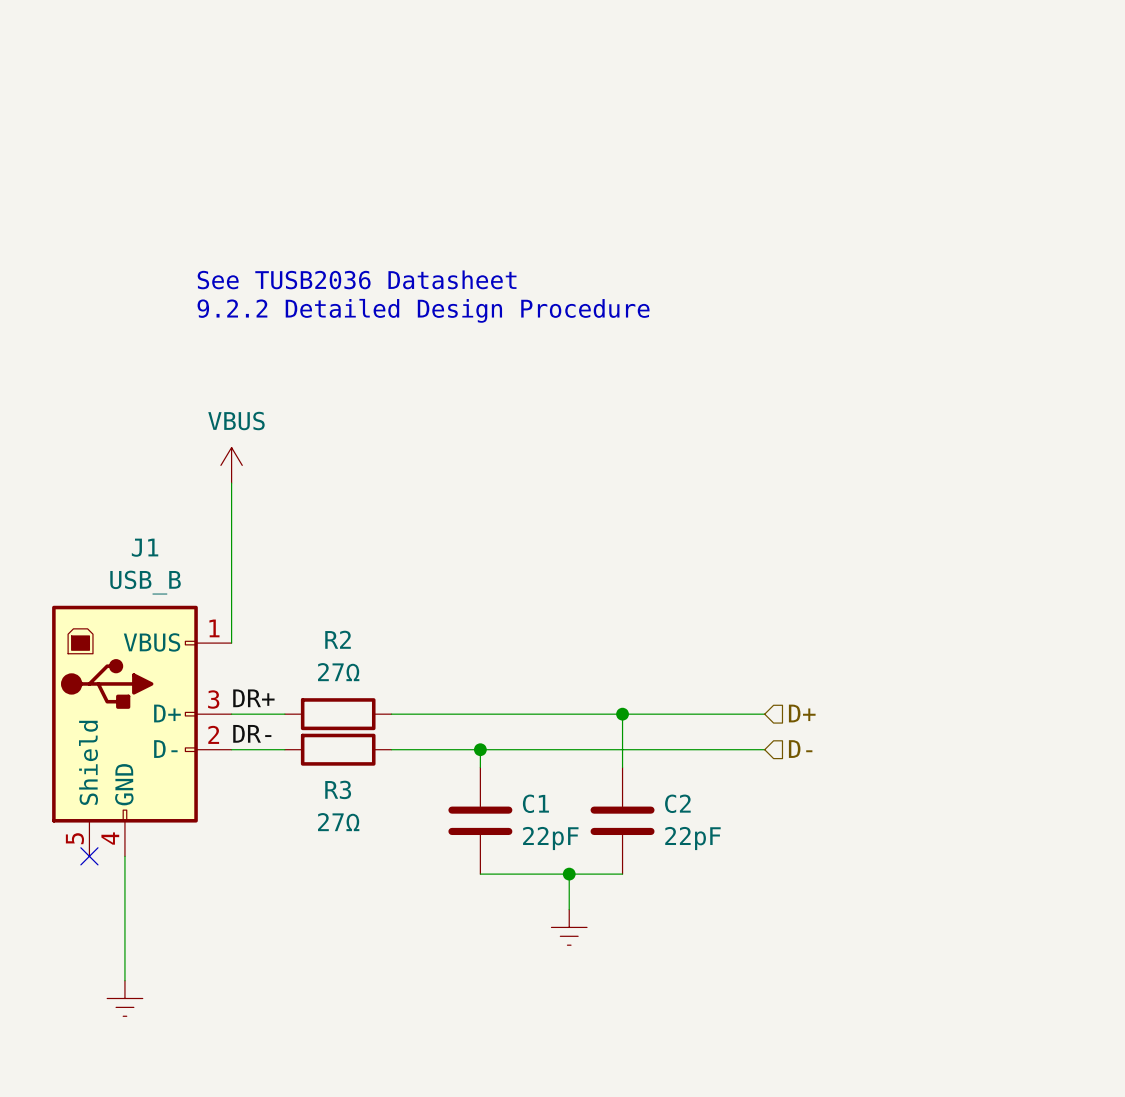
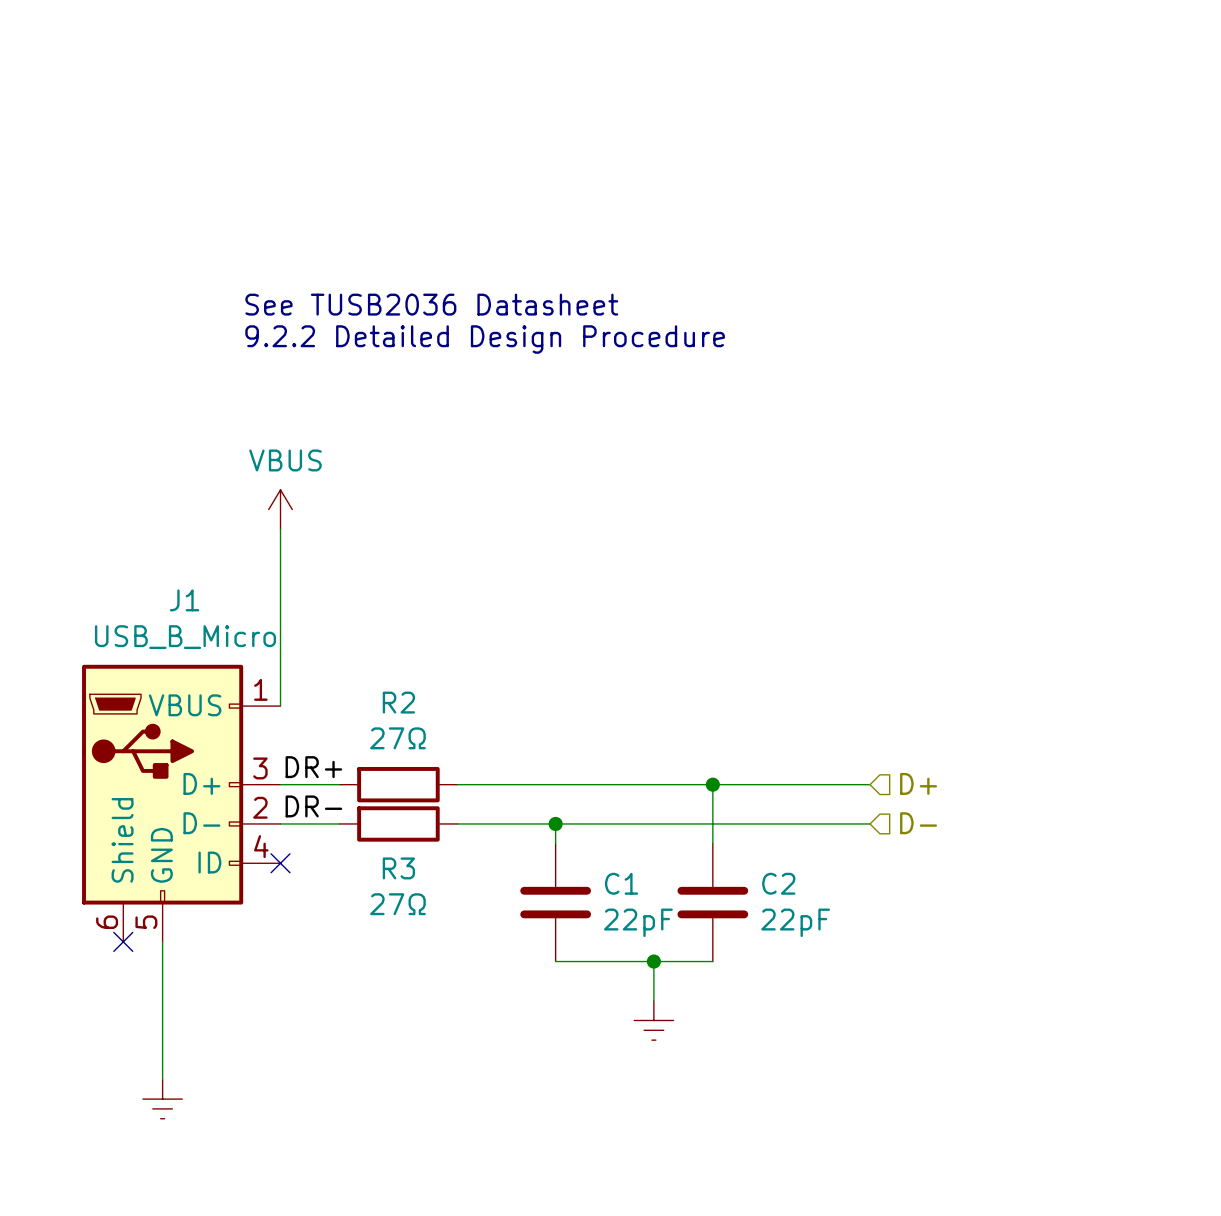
J1 value: USB_B (145, 582) -> USB_B_Micro (185, 637)
J1 symbol: [52, 605, 232, 857] -> [82, 664, 281, 942]
no-connect mark: none -> (280, 863)

